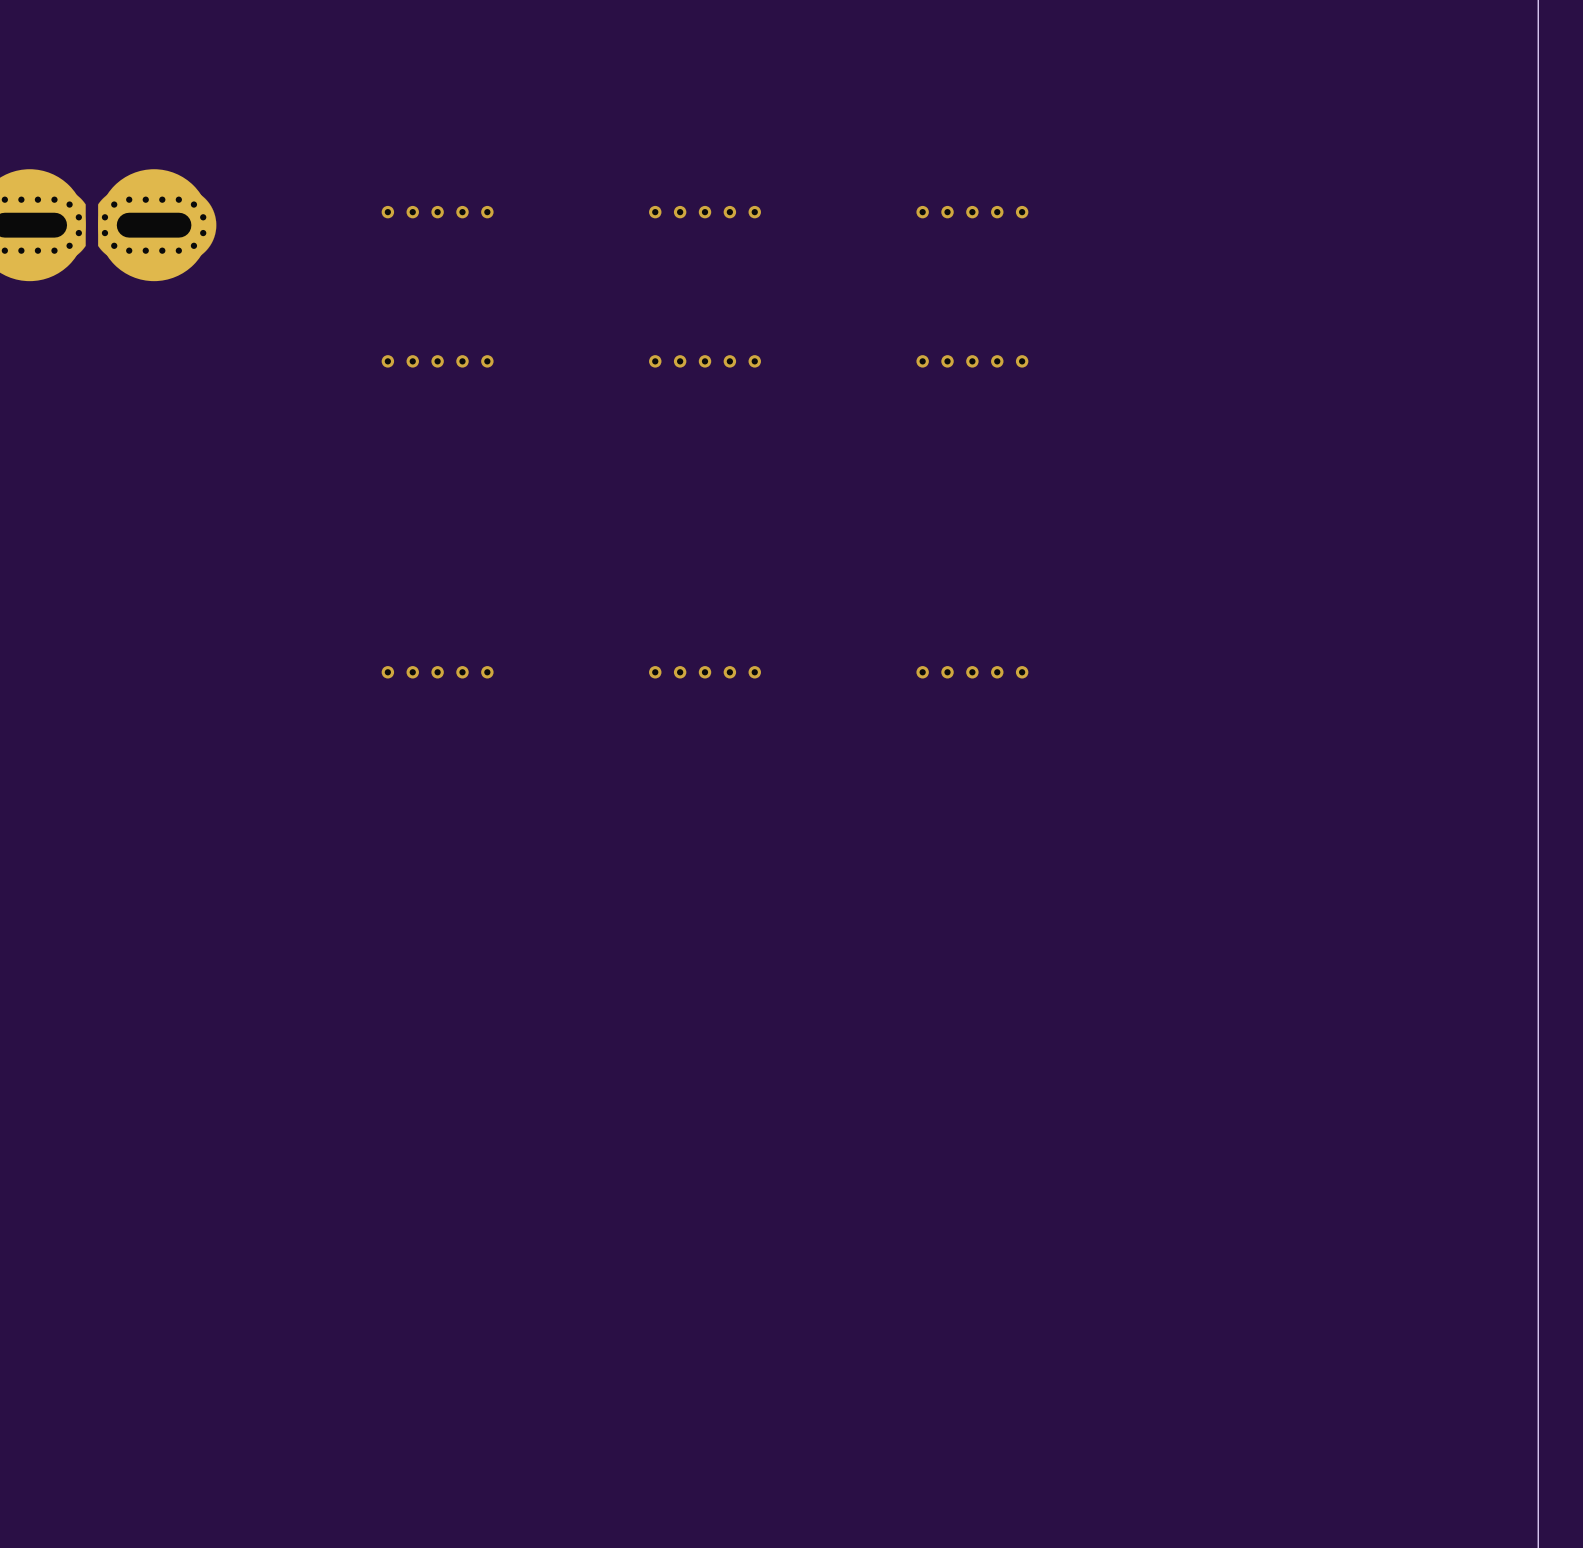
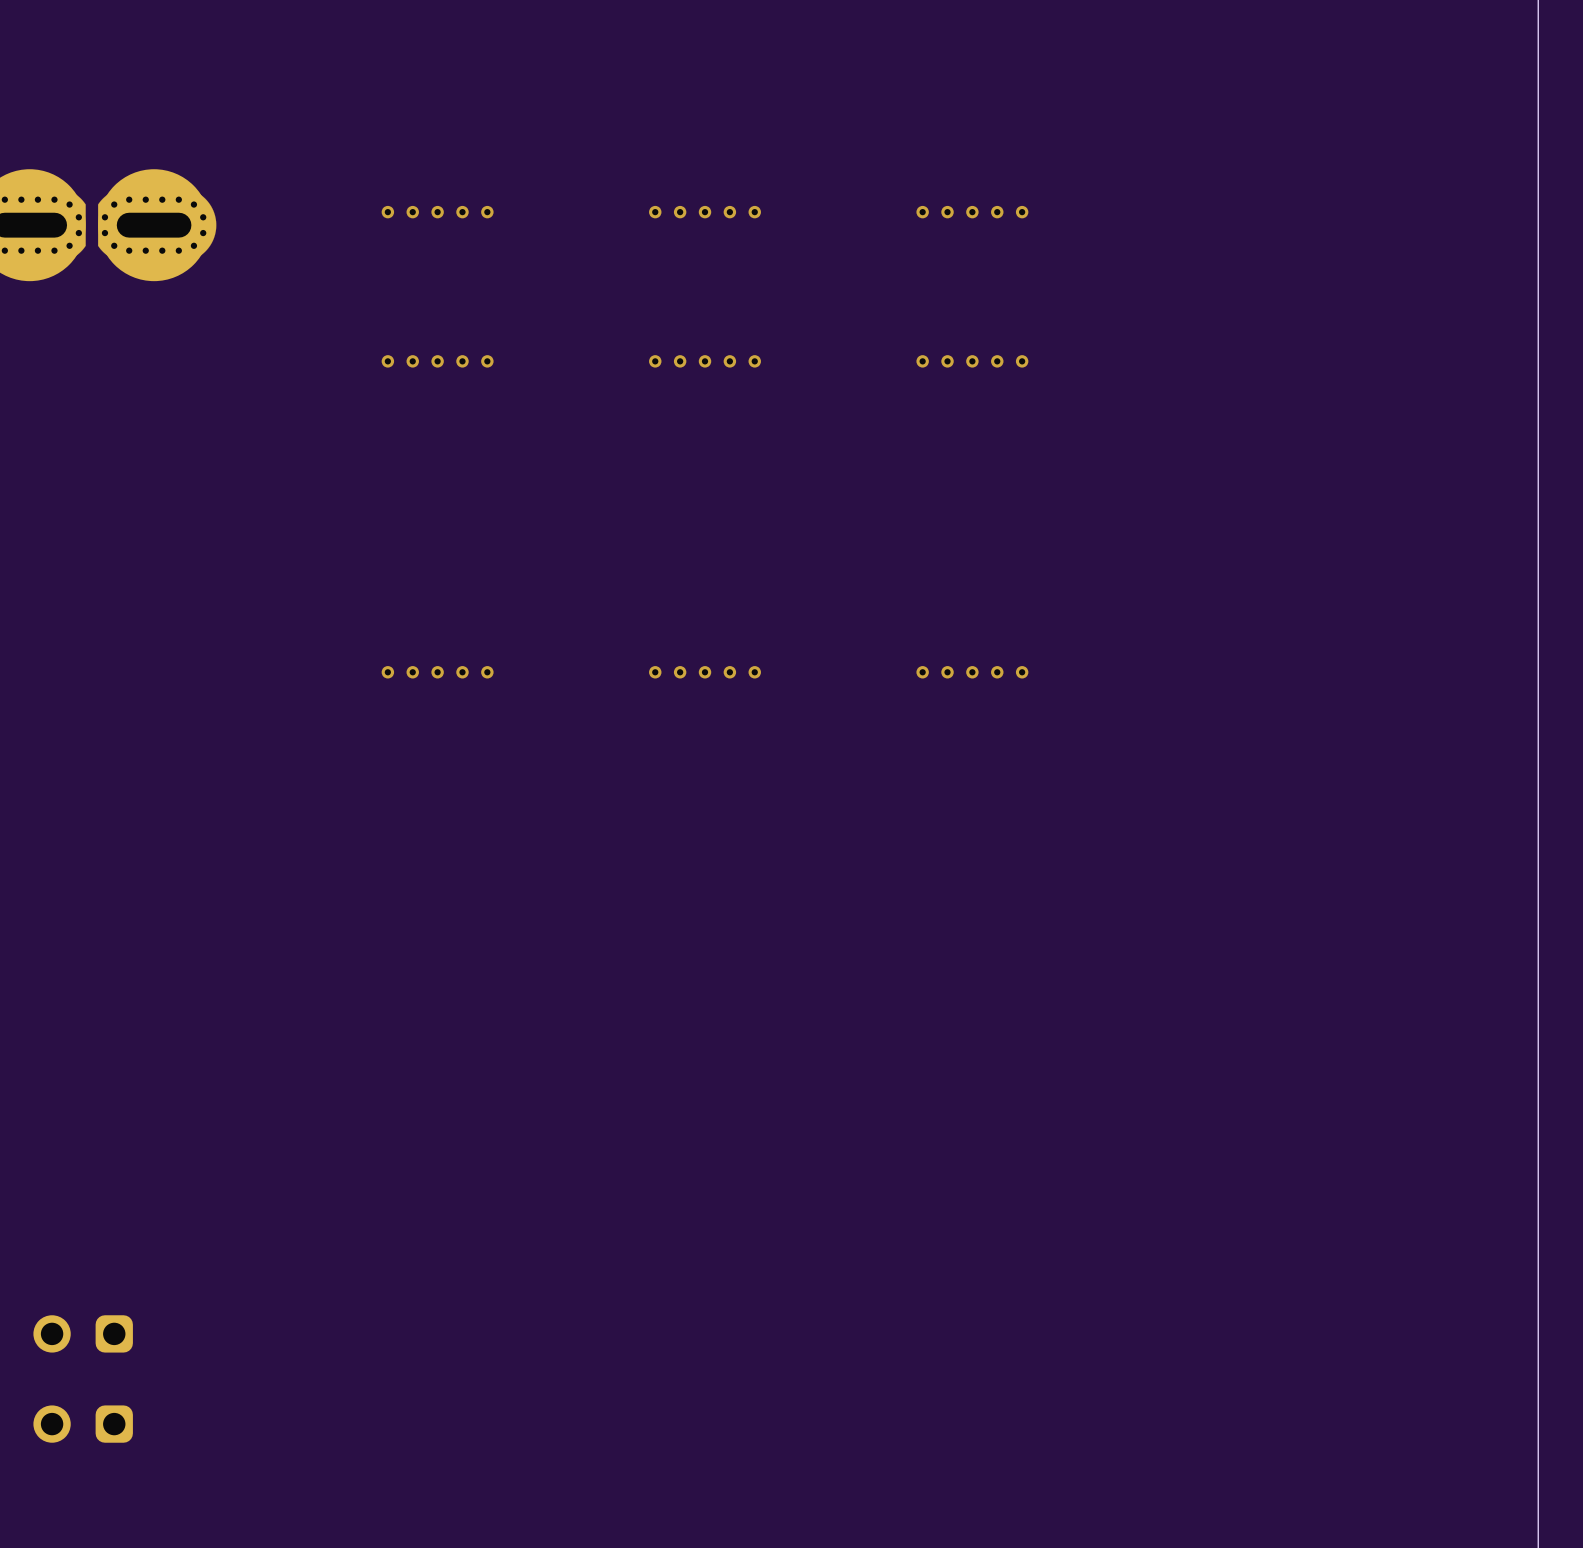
part: none -> (83, 1333)
part: none -> (83, 1424)

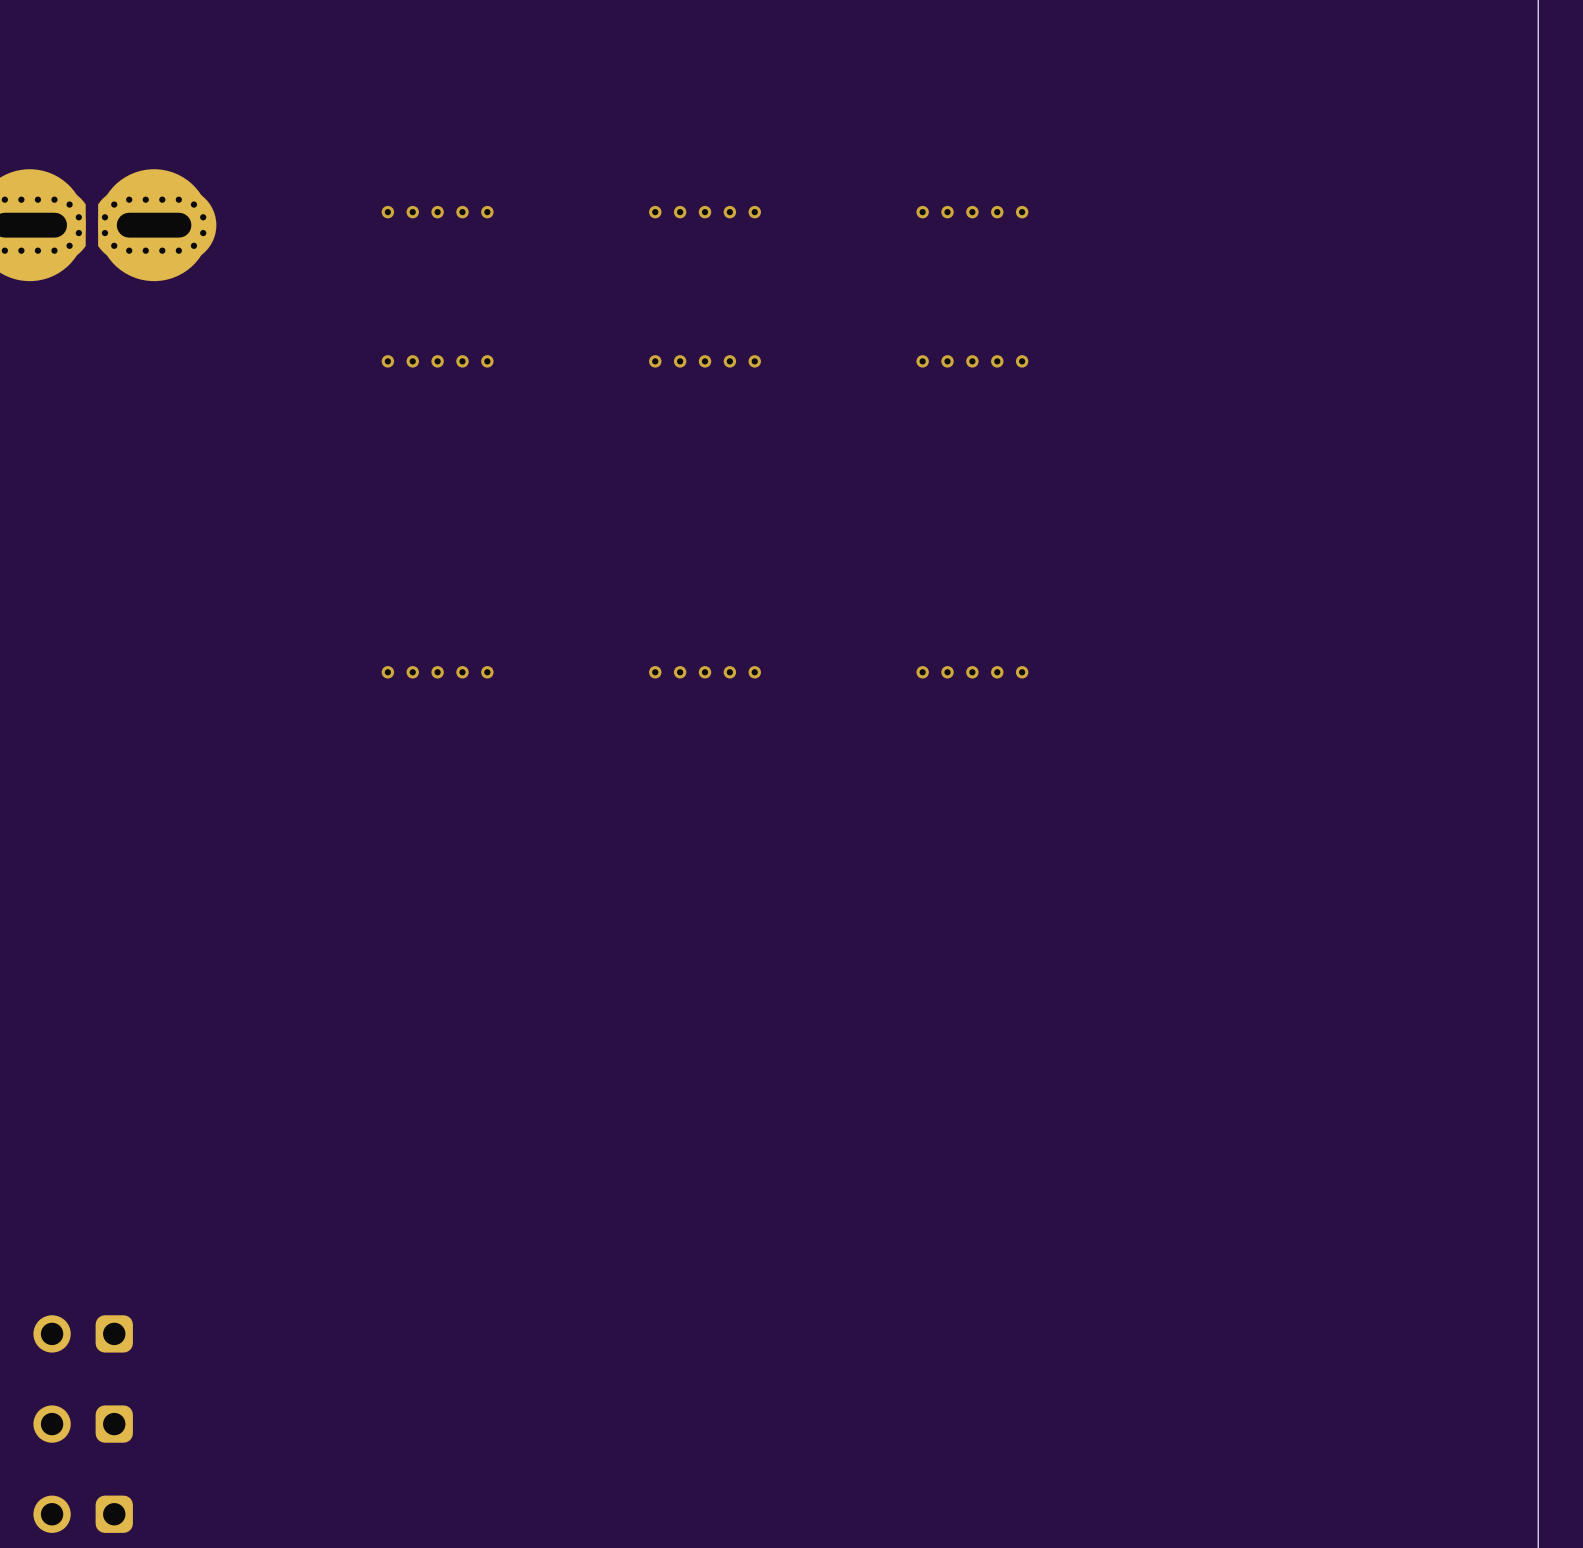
part: none -> (83, 1514)

